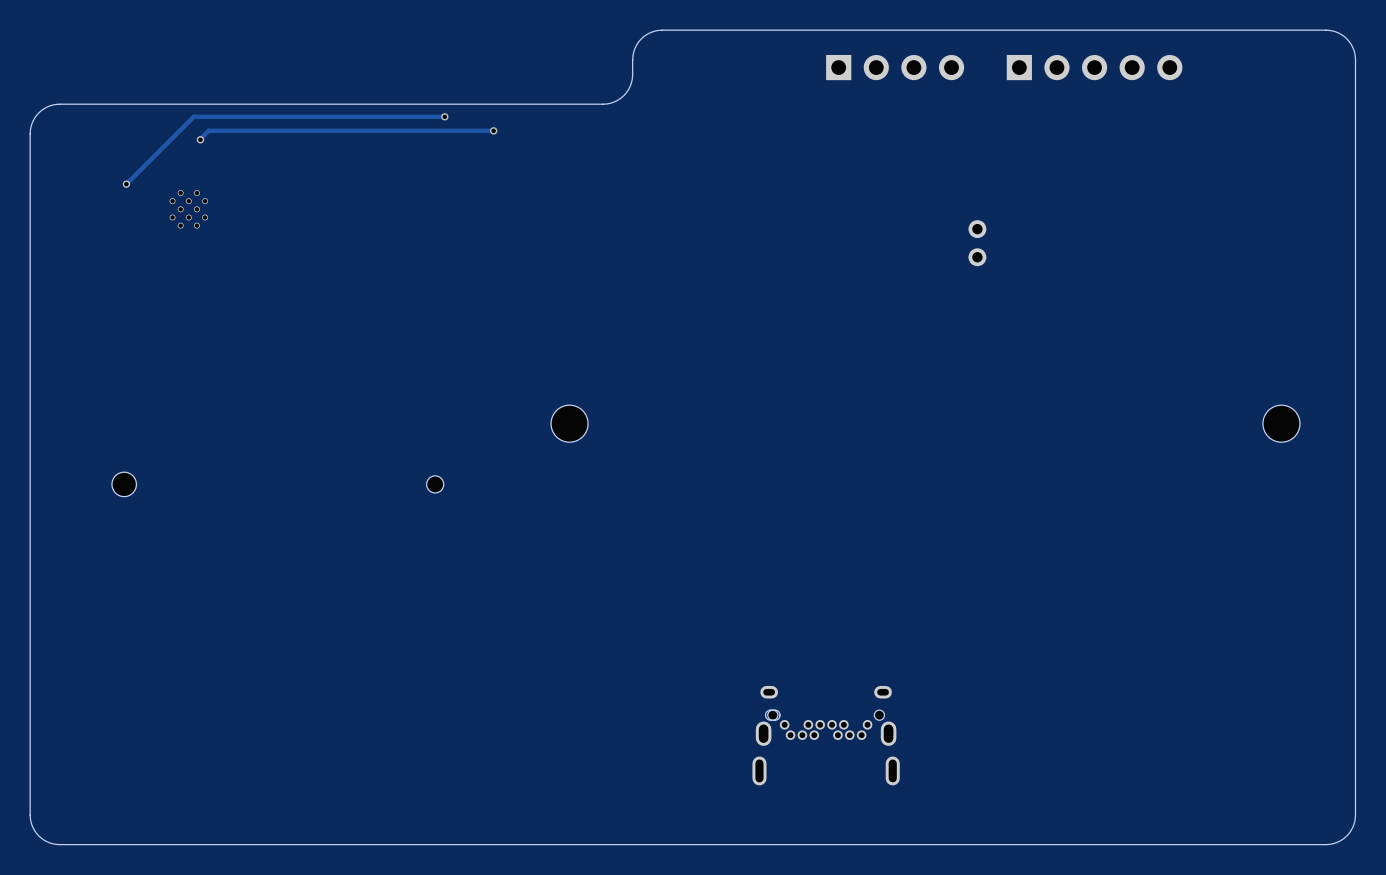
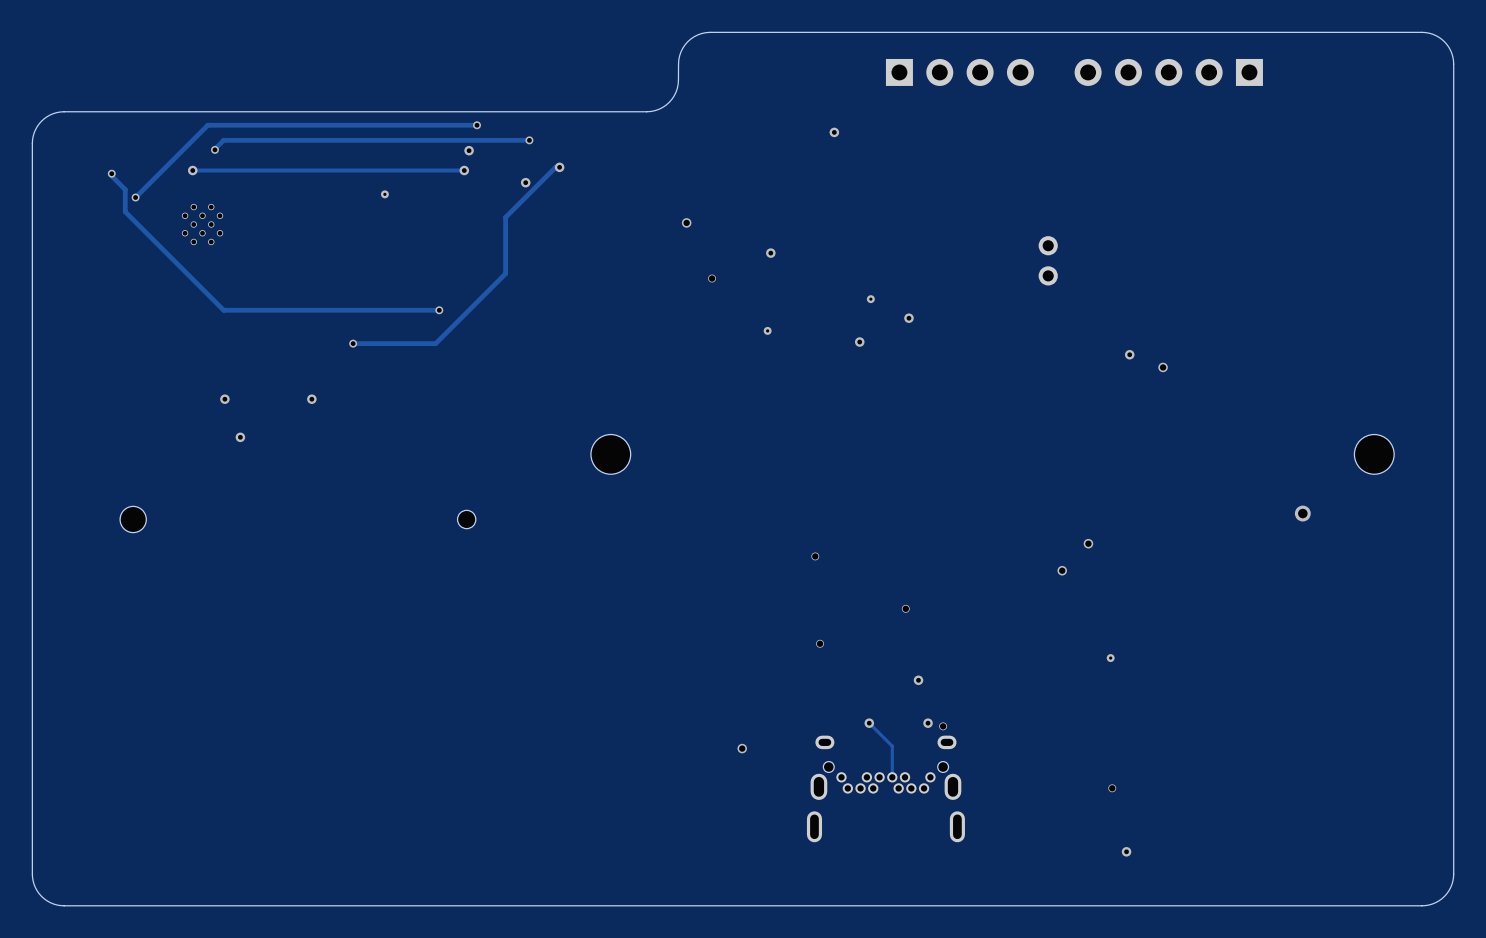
part rotation: 0° (1094, 67) -> 180° (1168, 72)
via: none -> (834, 132)
via: none -> (469, 150)
track: none -> (559, 167) (555, 167) (505, 217) (505, 273) (435, 343) (353, 343)
via: none -> (559, 167)
via: none -> (192, 170)
track: none -> (464, 170) (192, 170)
via: none -> (464, 170)
track: none -> (111, 173) (111, 176) (125, 189) (125, 211) (223, 310) (439, 310)
via: none -> (111, 173)
via: none -> (525, 182)
via: none -> (384, 194)
via: none -> (686, 222)
via: none -> (770, 253)
via: none -> (712, 278)
via: none -> (870, 299)
via: none -> (439, 310)
via: none -> (908, 318)
via: none -> (767, 330)
via: none -> (859, 342)
via: none -> (353, 343)
via: none -> (1129, 354)
via: none -> (1163, 367)
via: none -> (224, 399)
via: none -> (311, 399)
via: none -> (240, 437)
via: none -> (1302, 513)
via: none -> (1088, 543)
via: none -> (815, 556)
via: none -> (1062, 570)
via: none -> (905, 608)
via: none -> (820, 643)
via: none -> (1110, 658)
via: none -> (918, 680)
track: none -> (869, 723) (892, 746) (892, 777)
via: none -> (869, 723)
via: none -> (928, 723)
via: none -> (943, 726)
part footprint: [752, 685, 900, 786] -> [806, 735, 965, 843]
via: none -> (742, 748)
via: none -> (1112, 788)
via: none -> (1126, 851)

